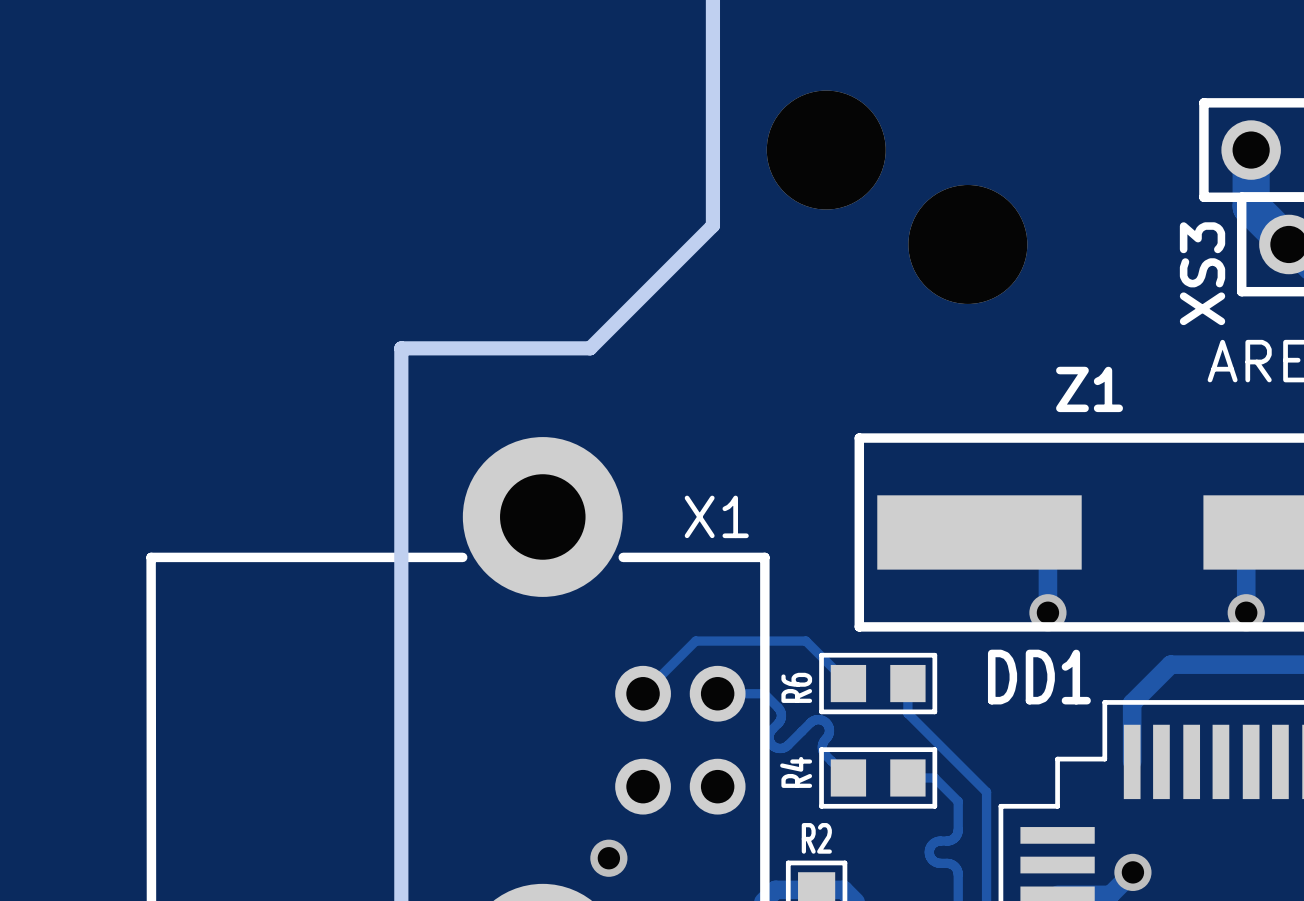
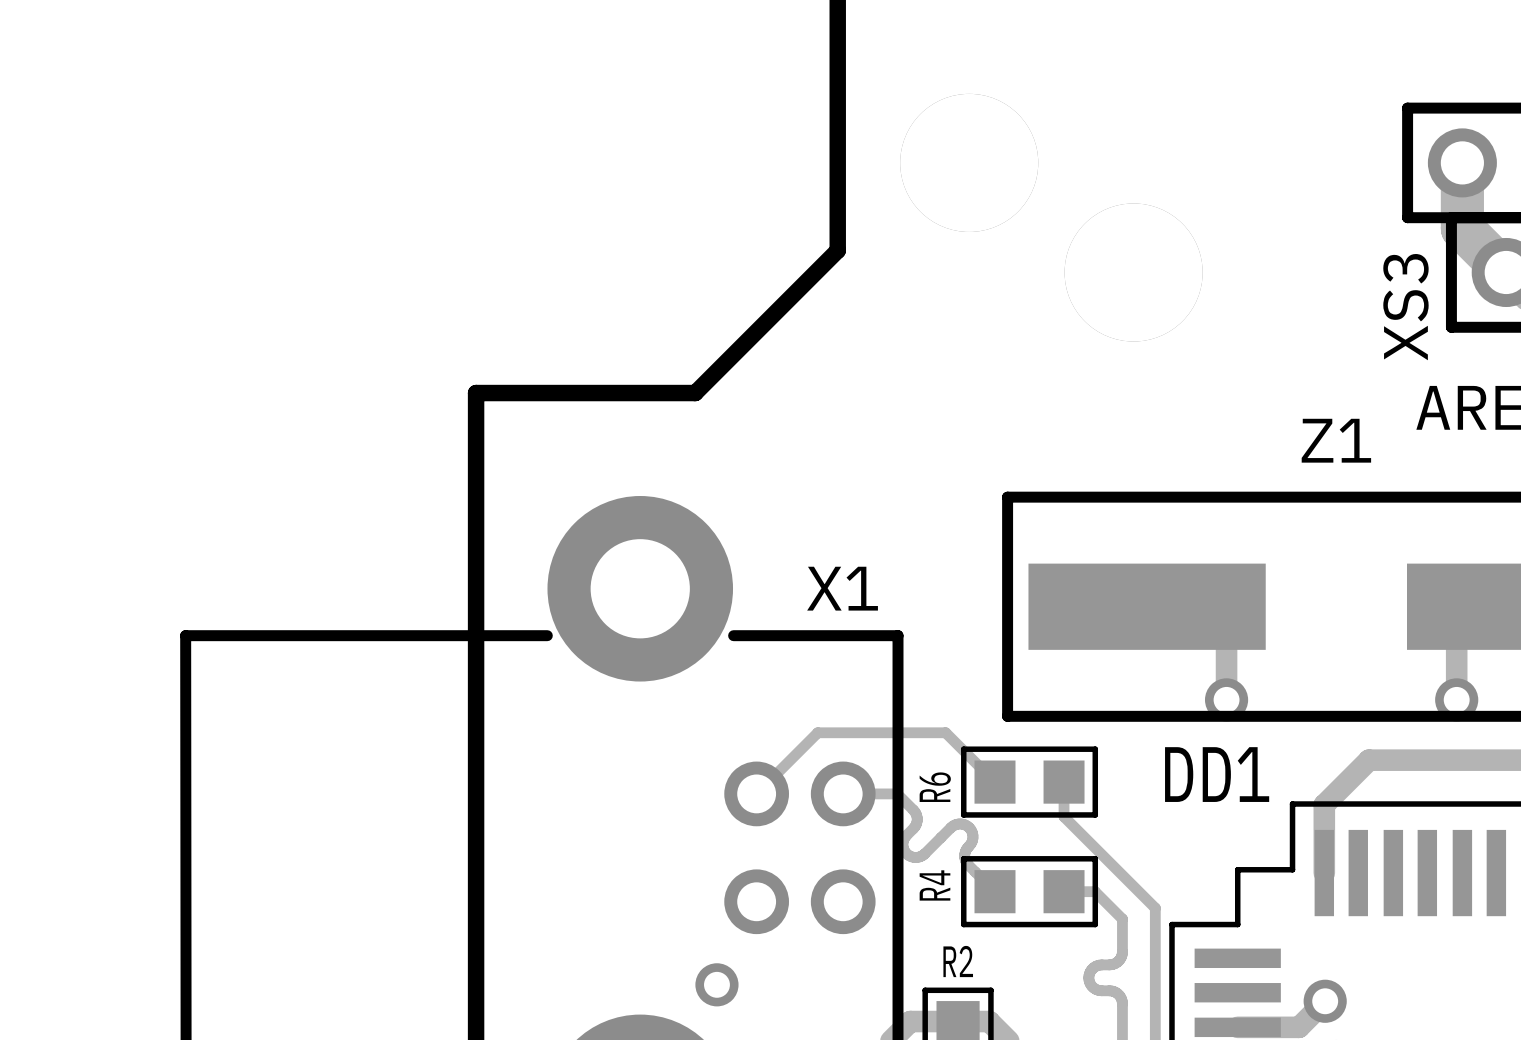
Z1 name position: Z1 (1089, 389) -> Z1 (1336, 440)

